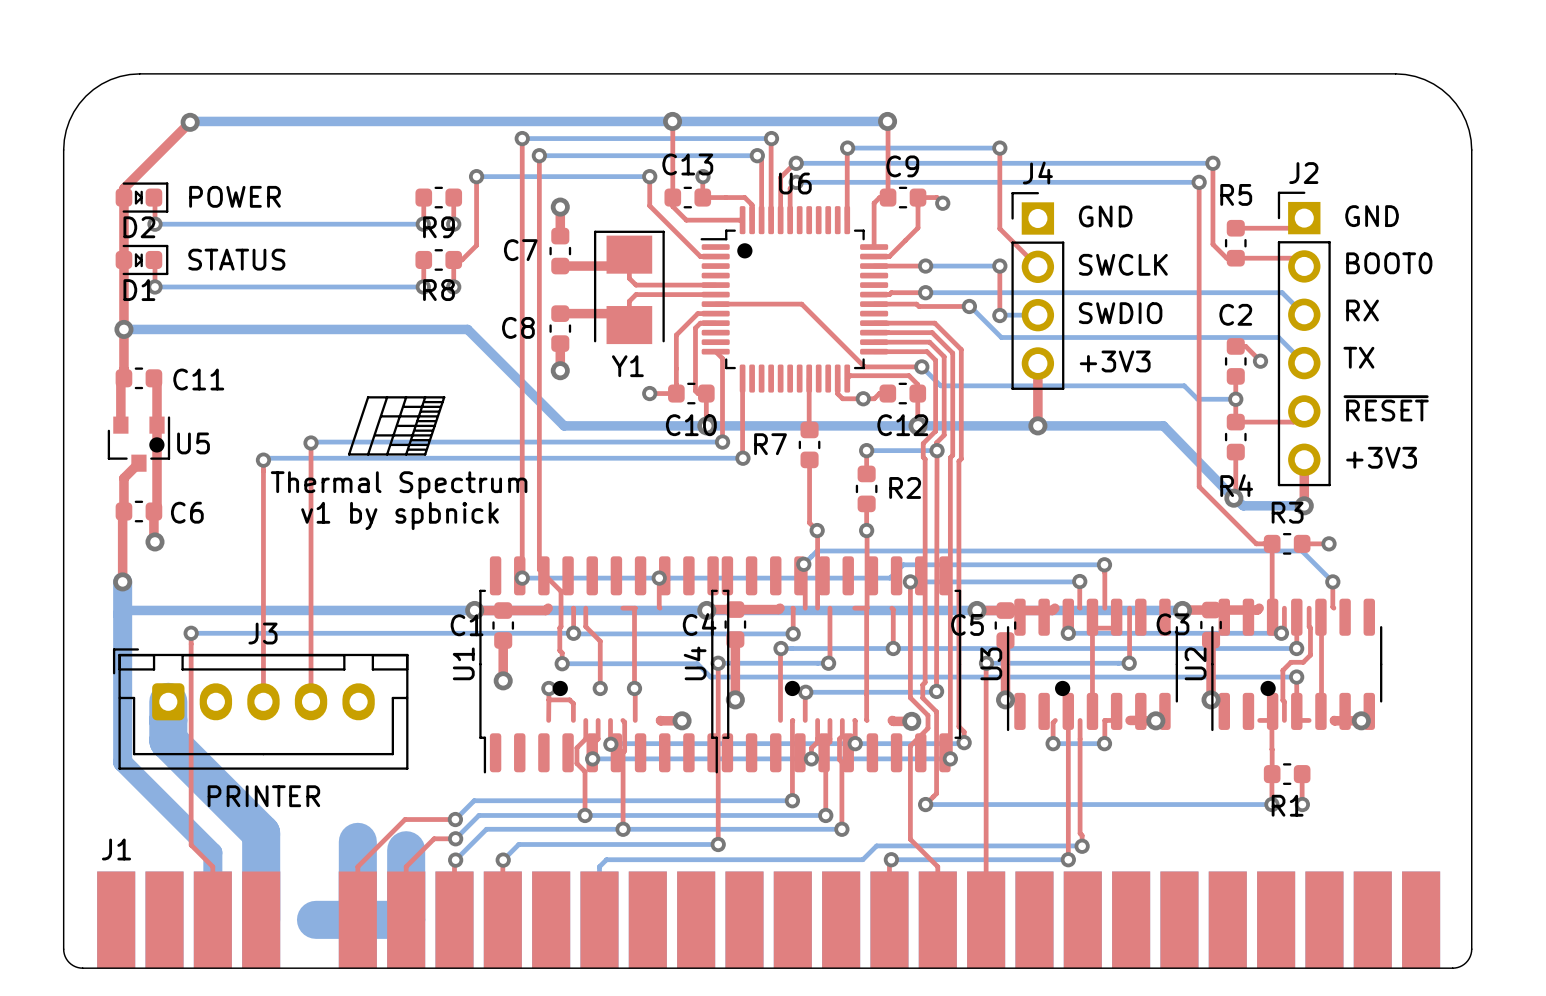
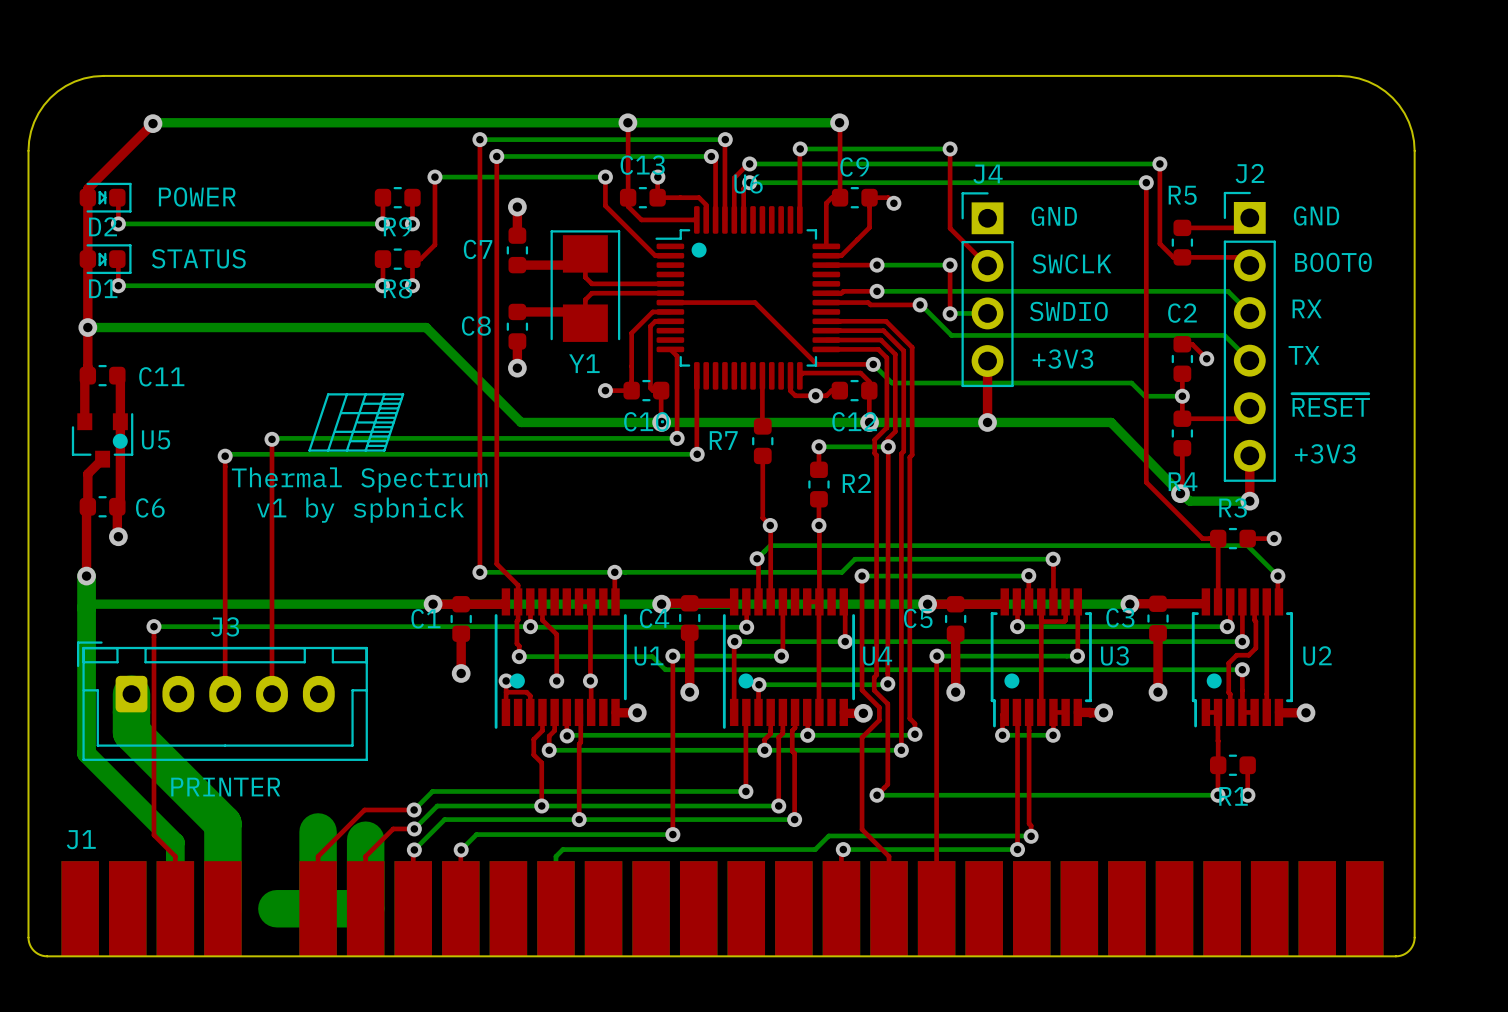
U1 footprint: [479, 556, 730, 774] -> [494, 588, 627, 729]
U4 footprint: [711, 556, 962, 774] -> [722, 588, 855, 729]
U3 footprint: [1006, 598, 1178, 732] -> [990, 588, 1092, 728]
U2 footprint: [1211, 598, 1383, 732] -> [1191, 588, 1294, 728]
U1 name position: U1 (463, 663) -> U1 (648, 656)
U4 name position: U4 (695, 663) -> U4 (877, 656)
U3 name position: U3 (991, 663) -> U3 (1114, 655)
U2 name position: U2 (1195, 663) -> U2 (1317, 655)

